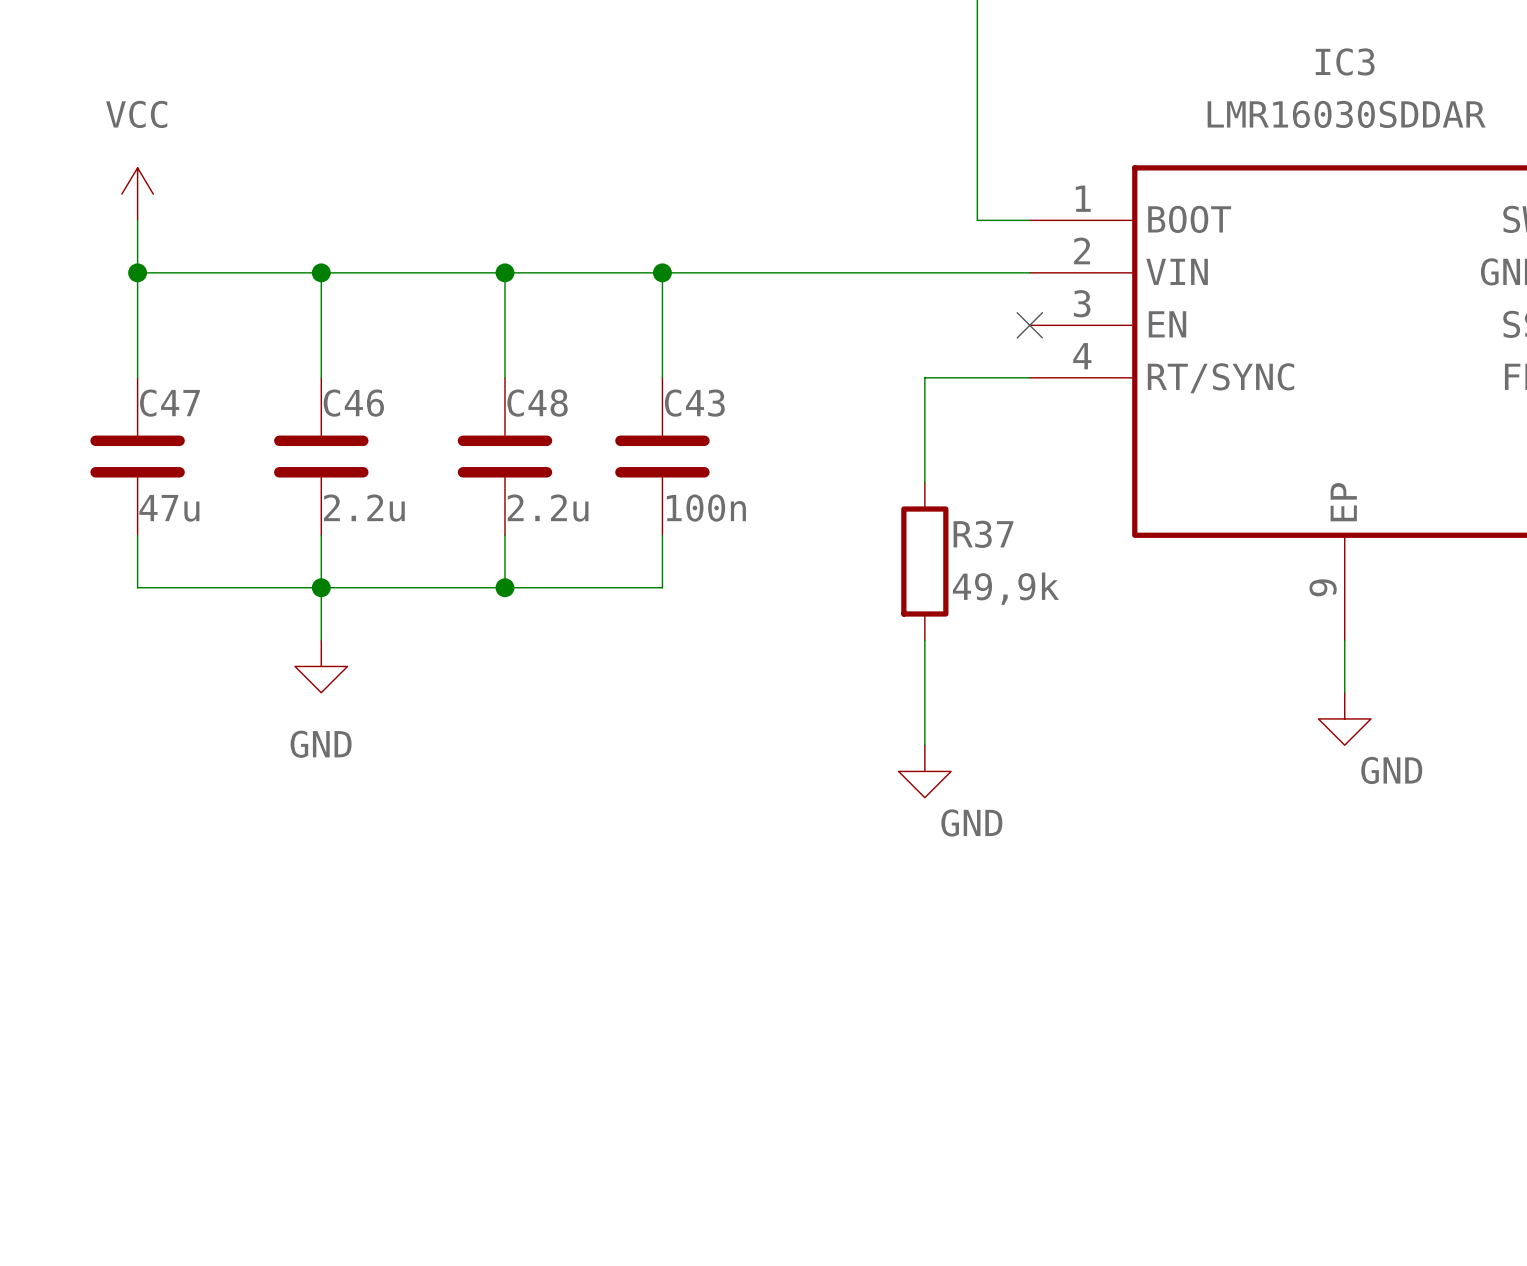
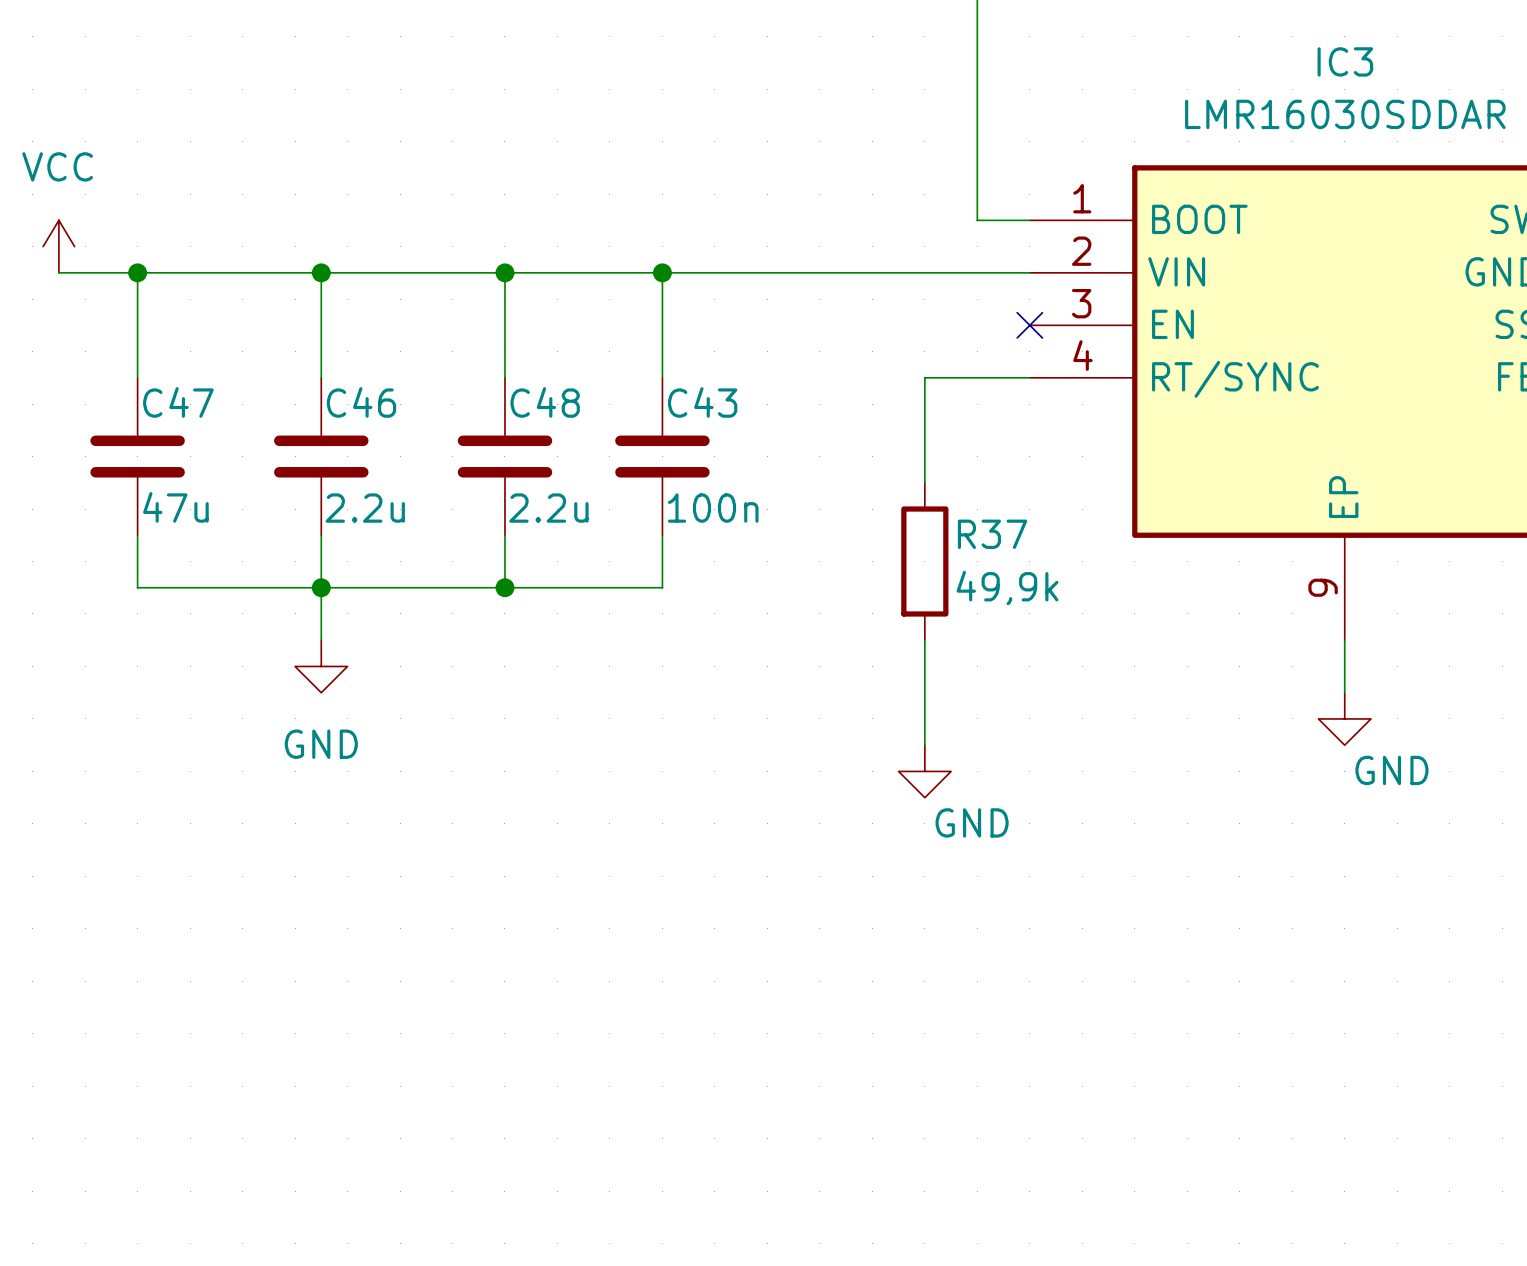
power symbol position: VCC (137, 194) -> VCC (58, 246)
wire: (137, 220) (137, 272) -> (58, 272) (137, 272)

